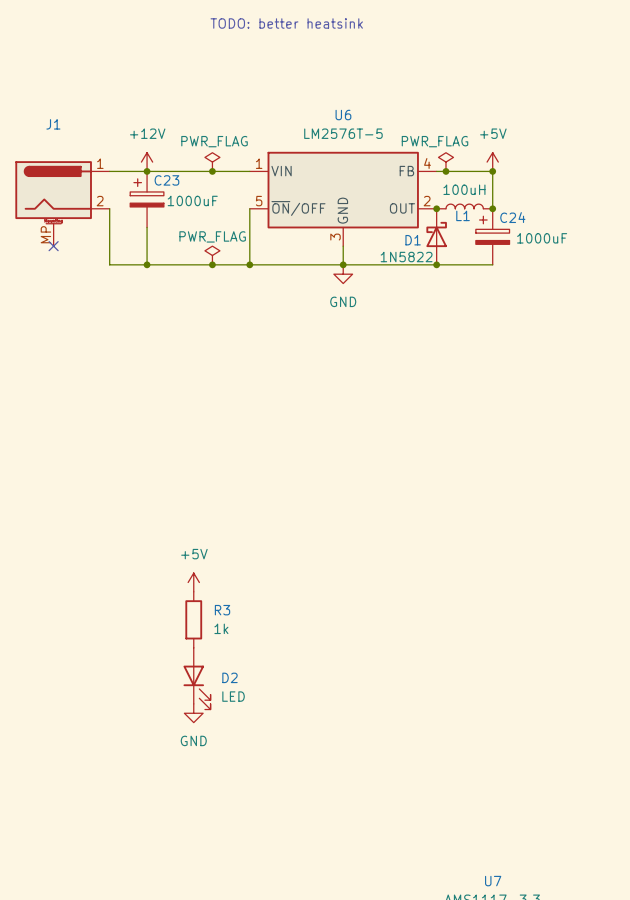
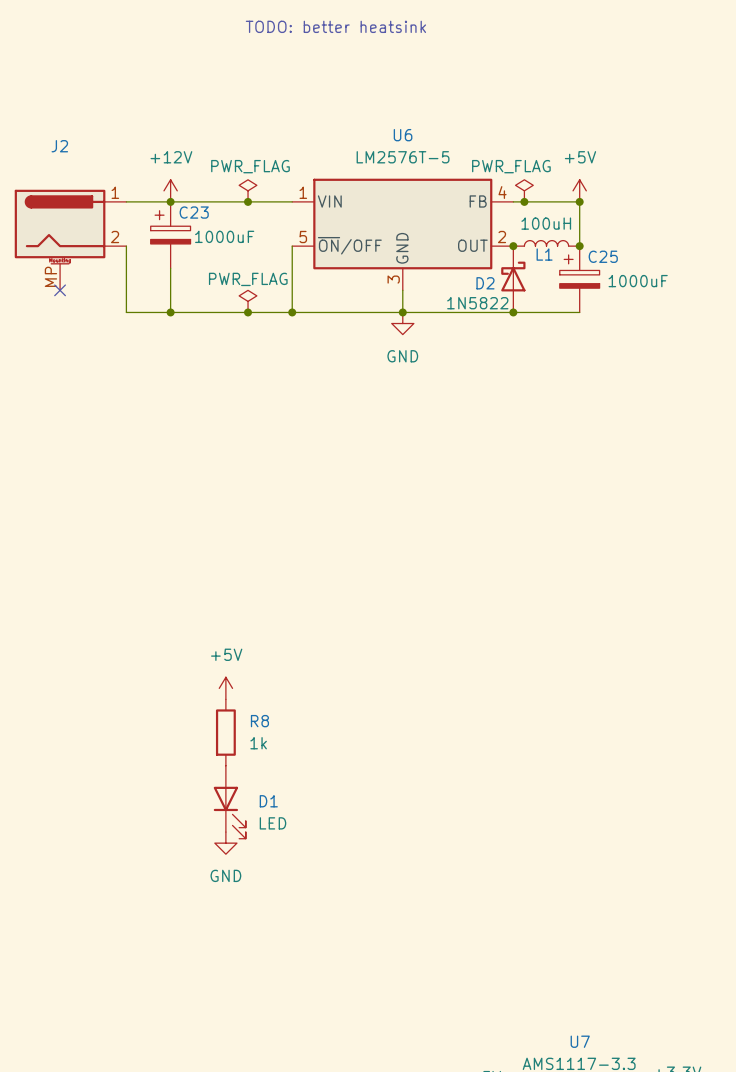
J1 name: J1 (53, 124) -> J2 (59, 146)
C24 name: C24 (512, 217) -> C25 (603, 256)
D1 name: D1 (413, 240) -> D2 (485, 283)
R3 name: R3 (222, 610) -> R8 (259, 721)
D2 name: D2 (229, 677) -> D1 (268, 801)

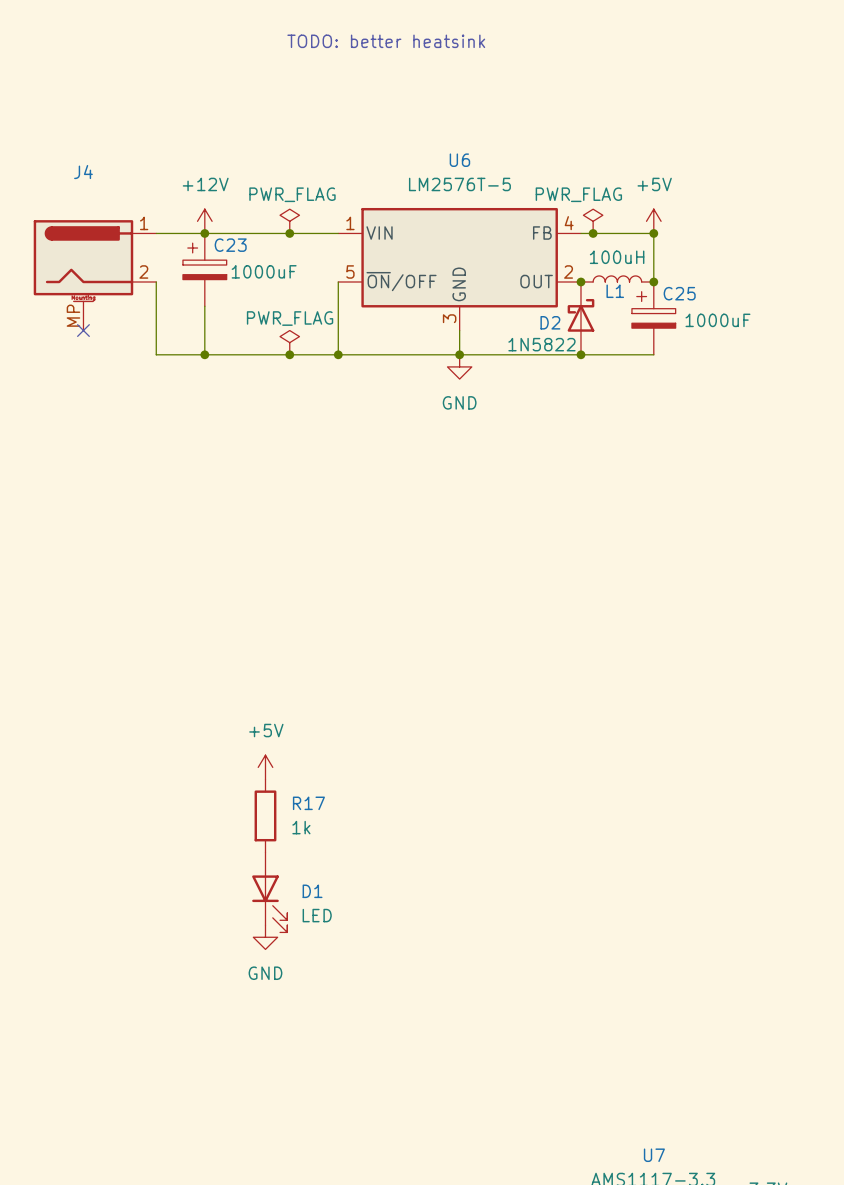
J2 name: J2 (59, 146) -> J4 (83, 172)
R8 name: R8 (259, 721) -> R17 (308, 803)

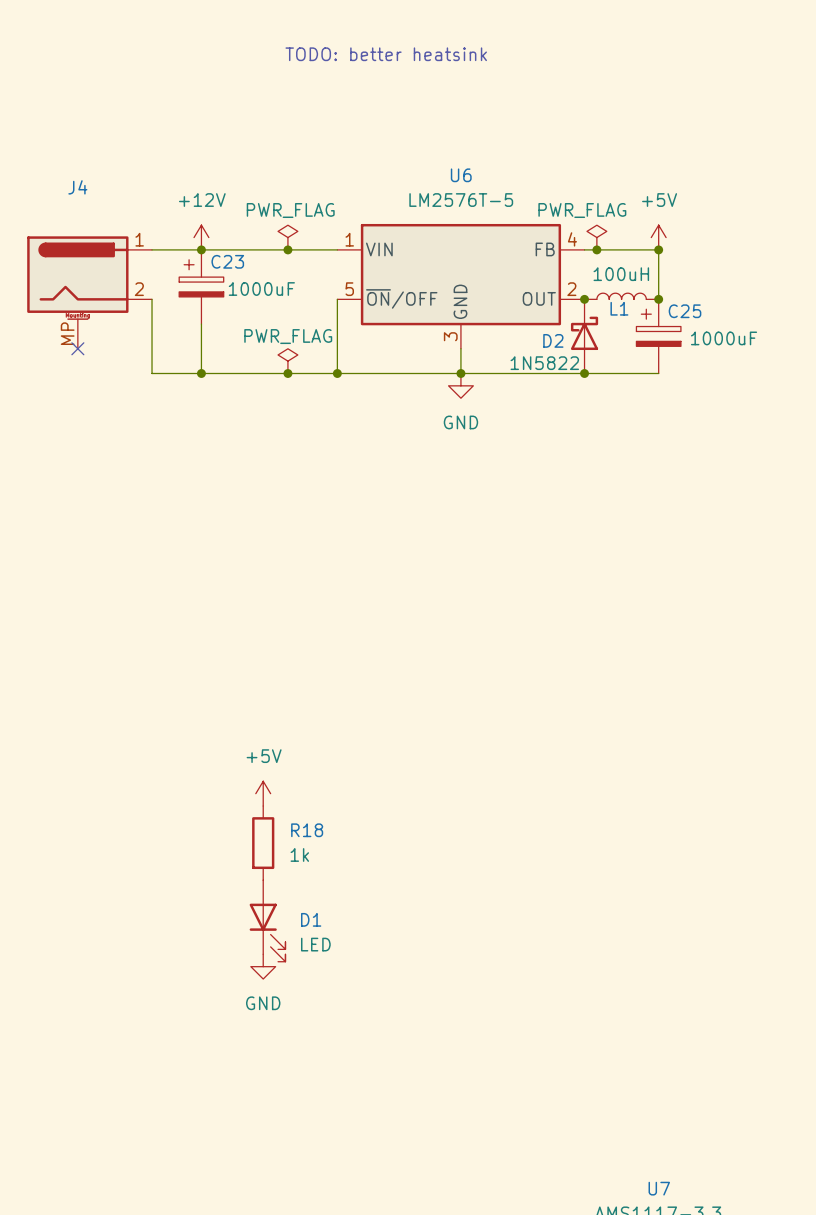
R17 name: R17 (308, 803) -> R18 (307, 830)

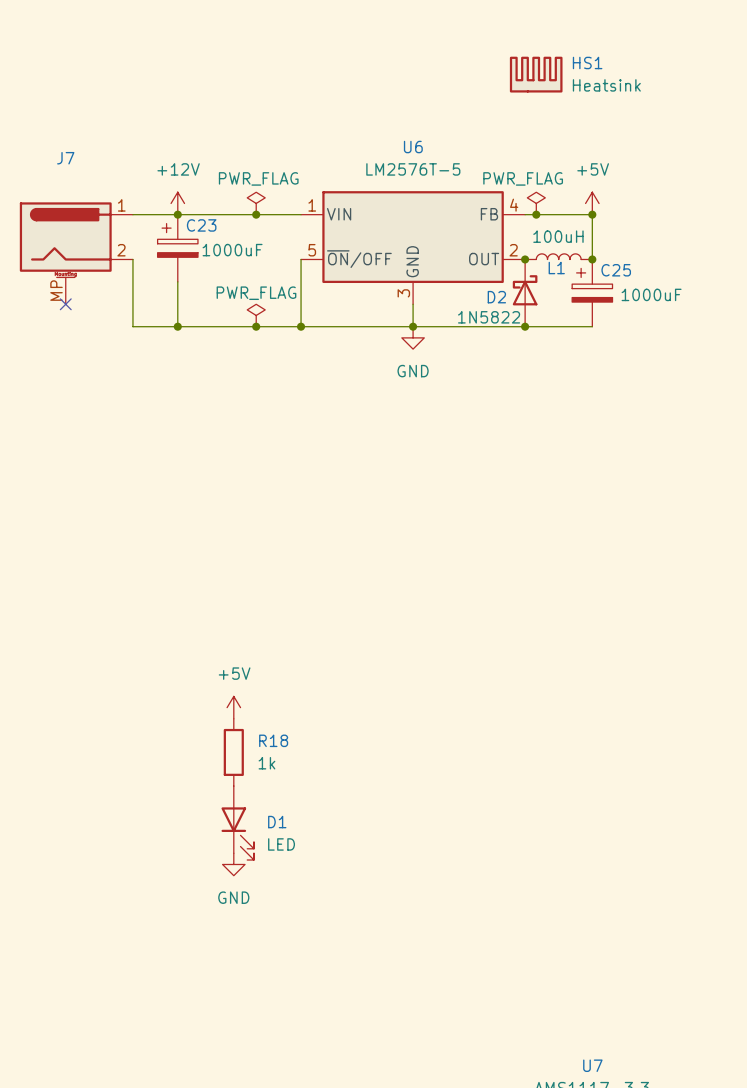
text: TODO: better heatsink (386, 54) -> none
HS1: none -> Heatsink (536, 74)
J4 name: J4 (77, 187) -> J7 (65, 158)

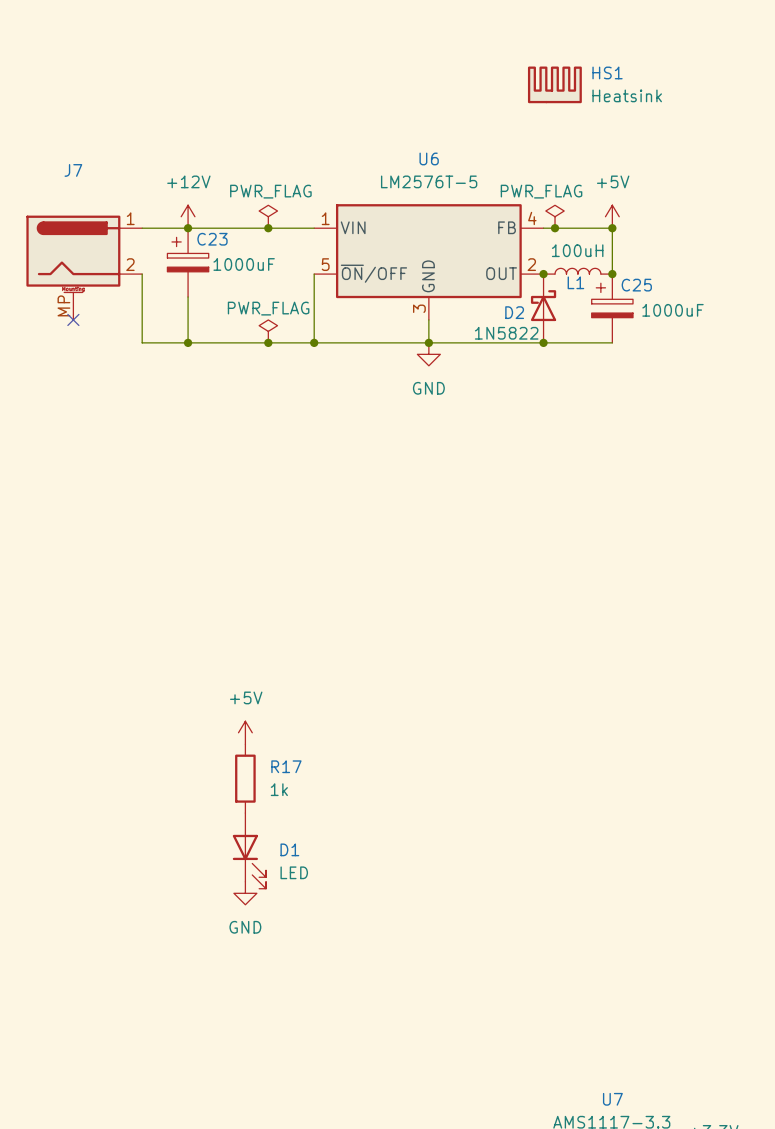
R18 name: R18 (273, 740) -> R17 (286, 766)

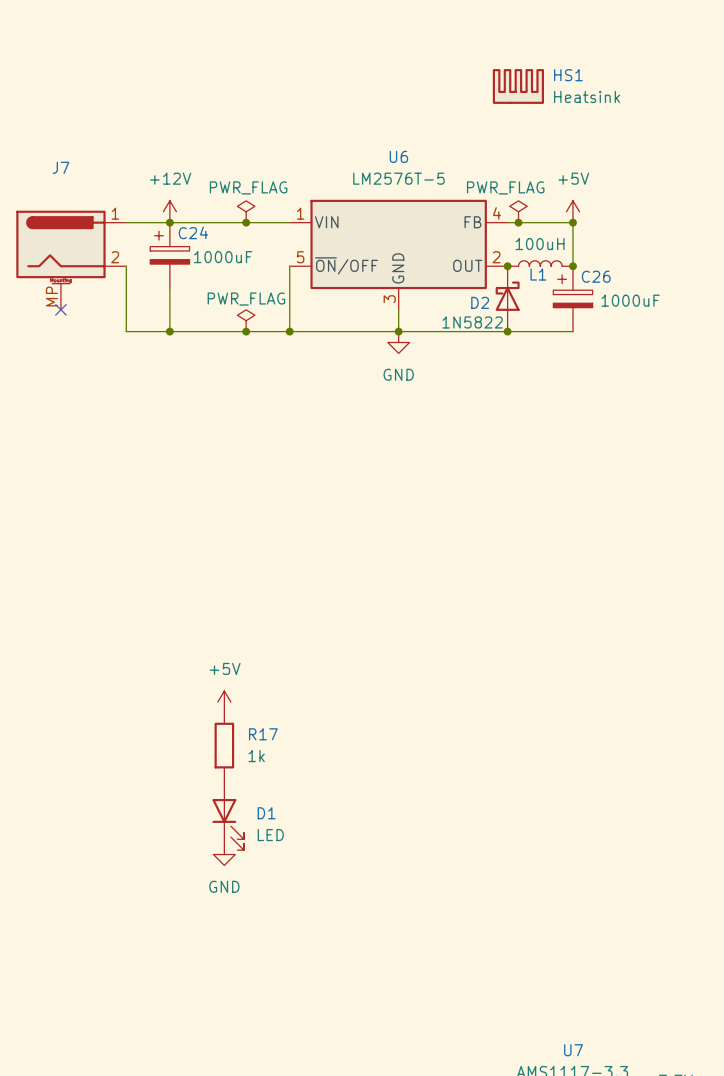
C23 name: C23 (212, 239) -> C24 (193, 232)
C25 name: C25 (636, 285) -> C26 (596, 276)

